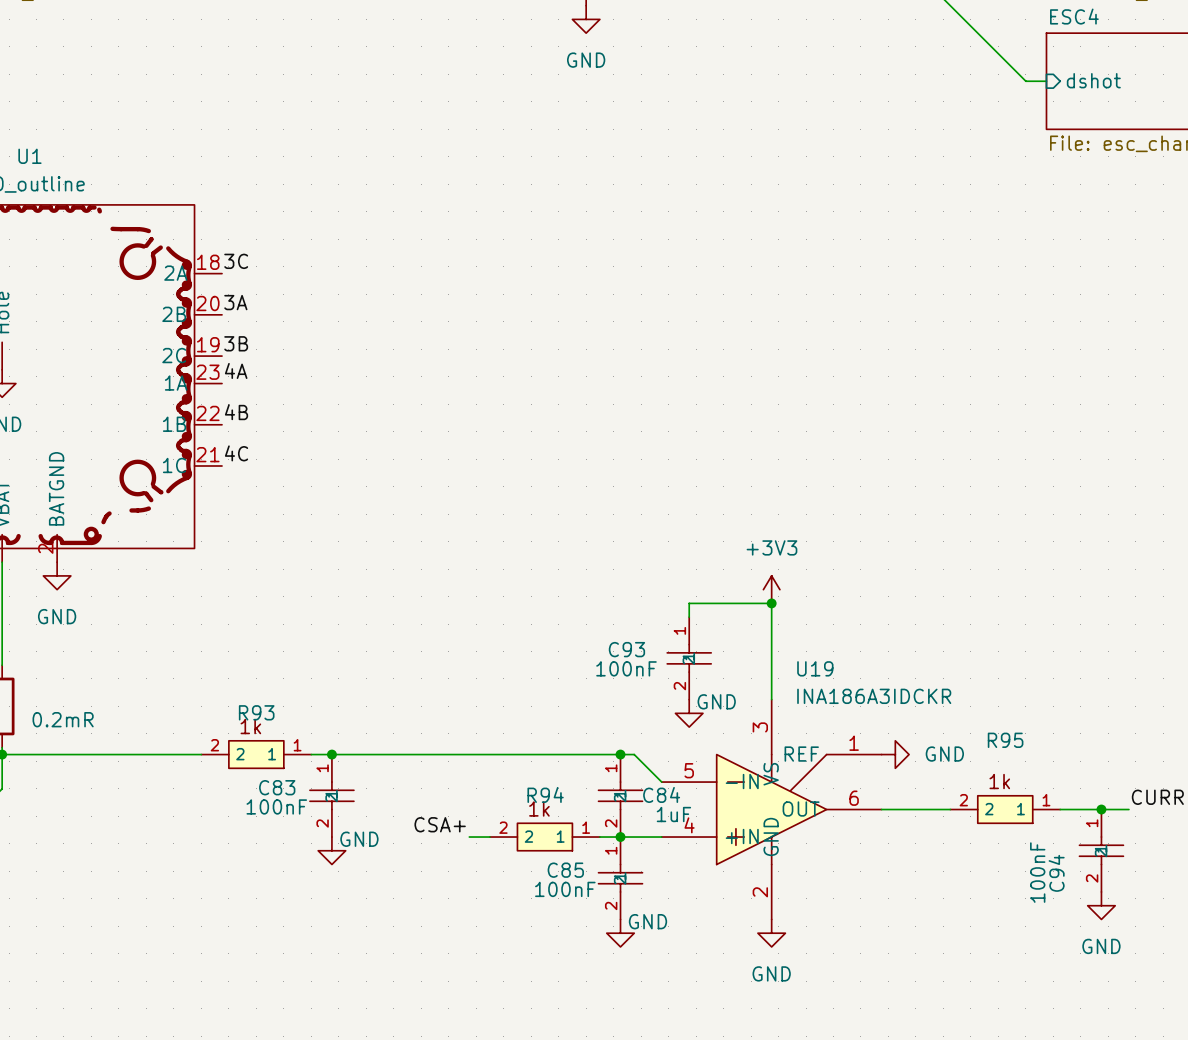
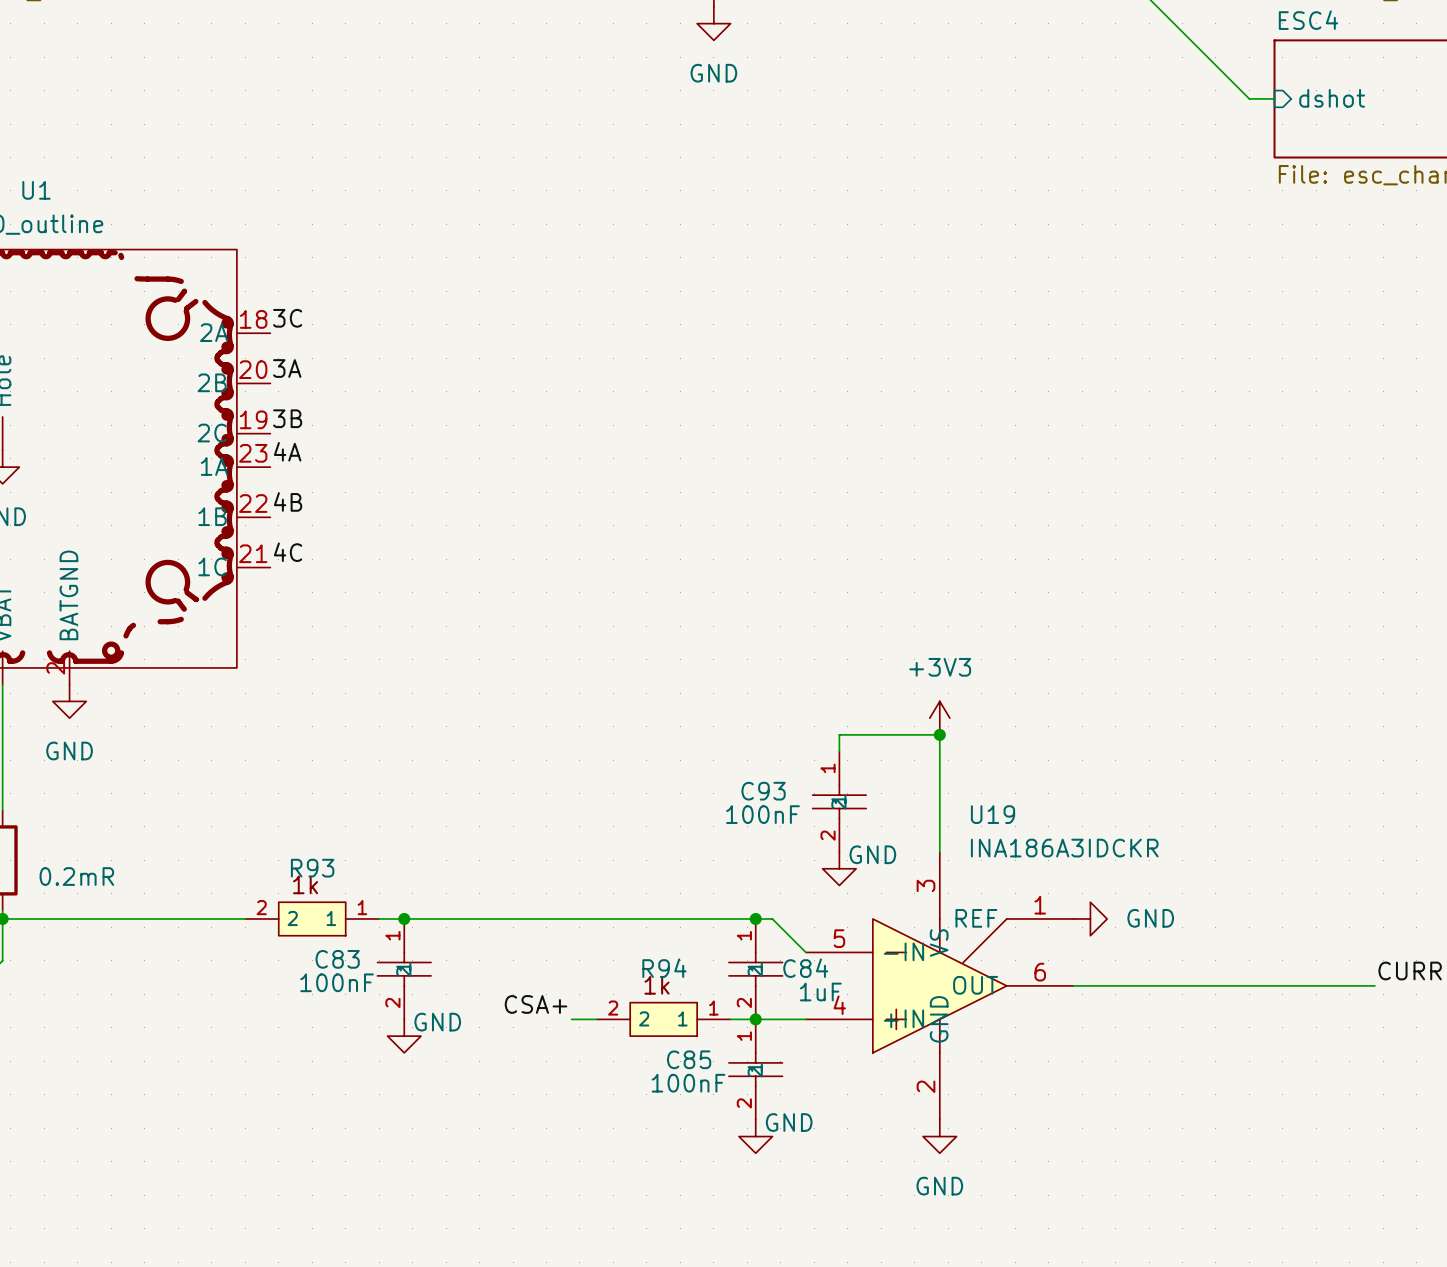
R95: (1005, 809) -> none
junction: (1101, 809) -> none
C94: 100nF (1101, 850) -> none
power symbol: GND (1101, 905) -> none

